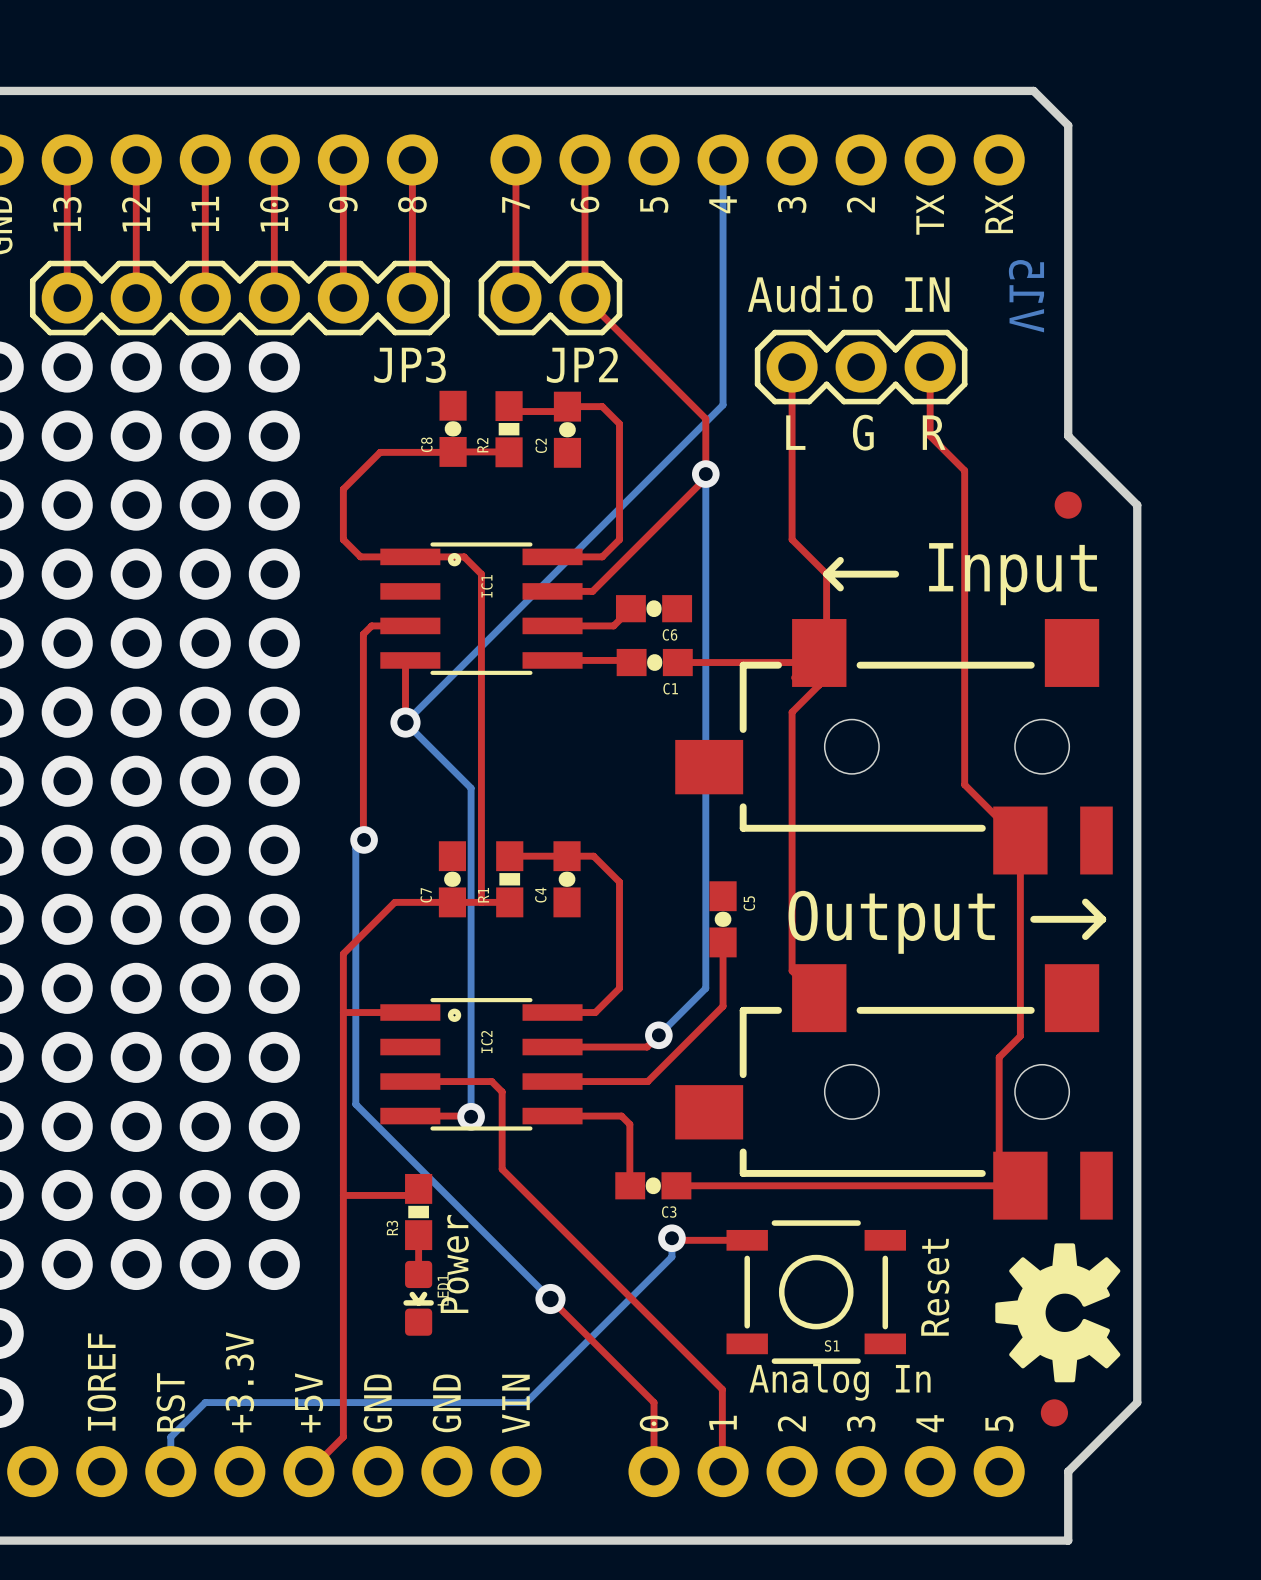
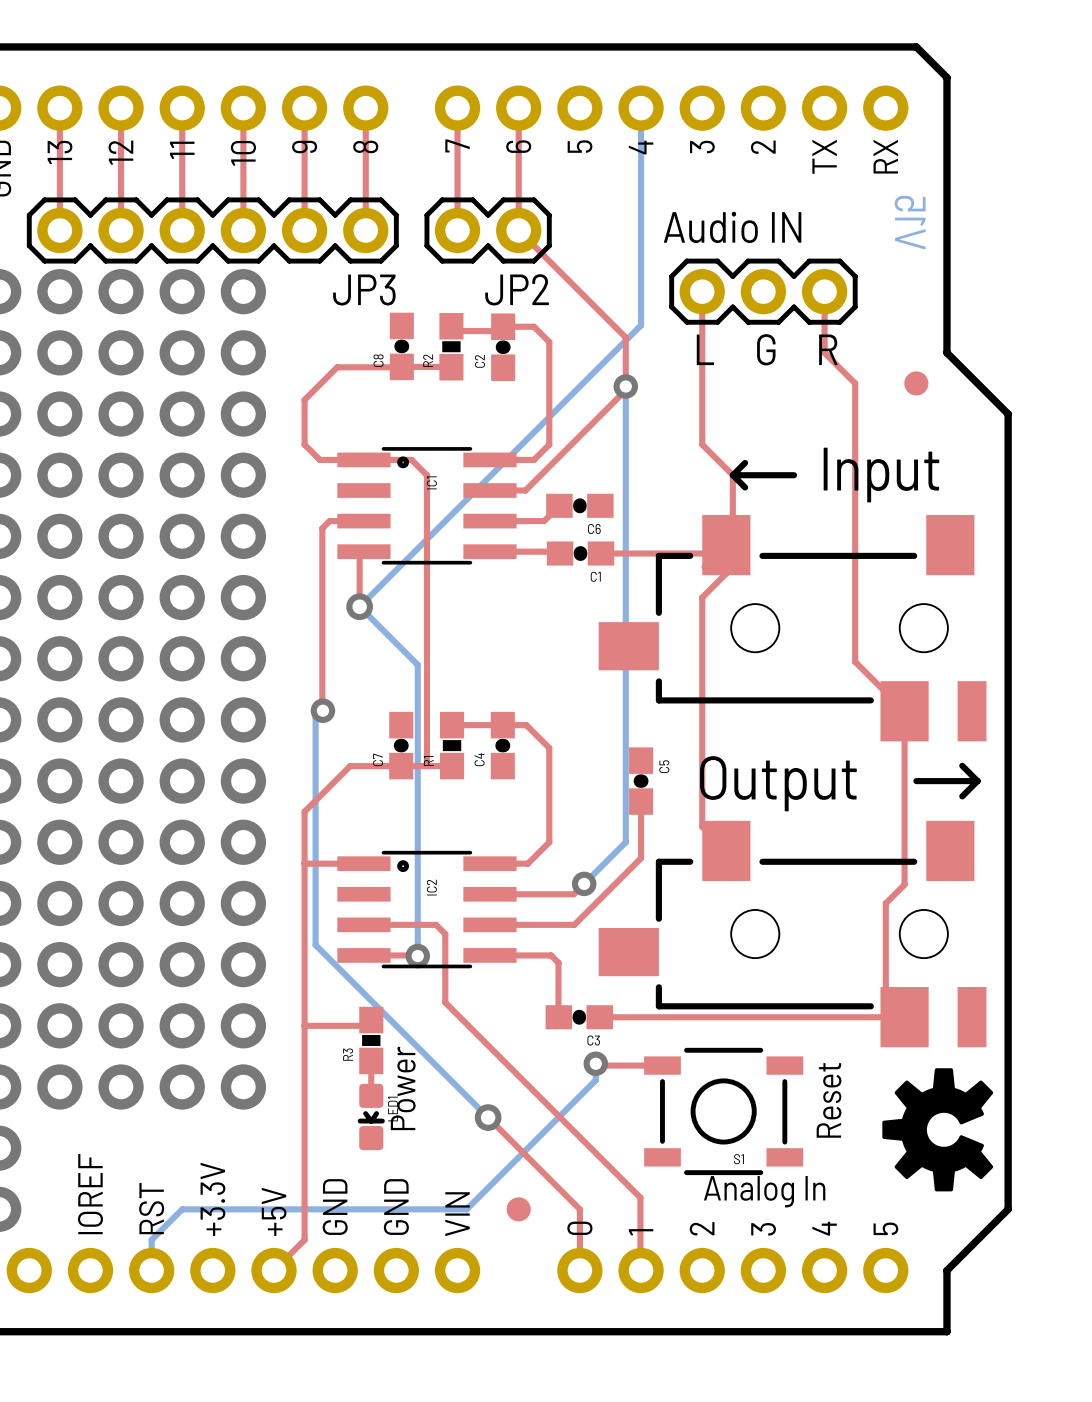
part position: (1068, 505) -> (916, 383)
part position: (1054, 1412) -> (518, 1209)

